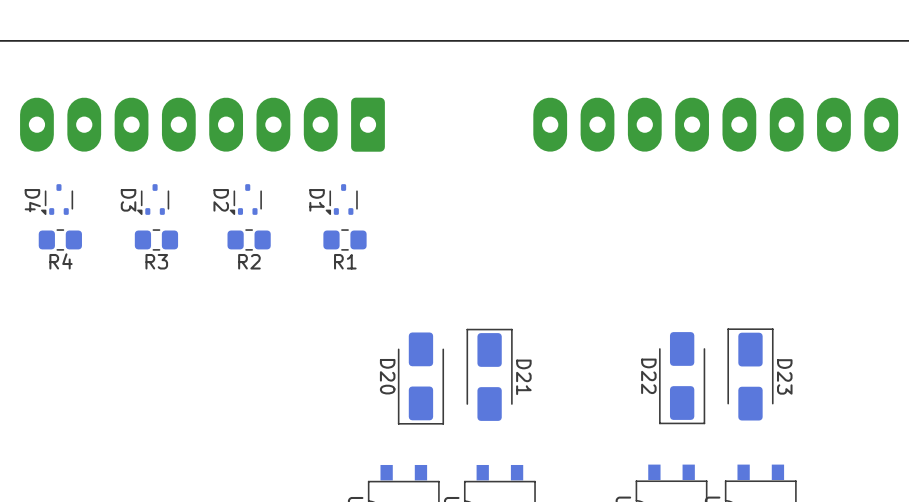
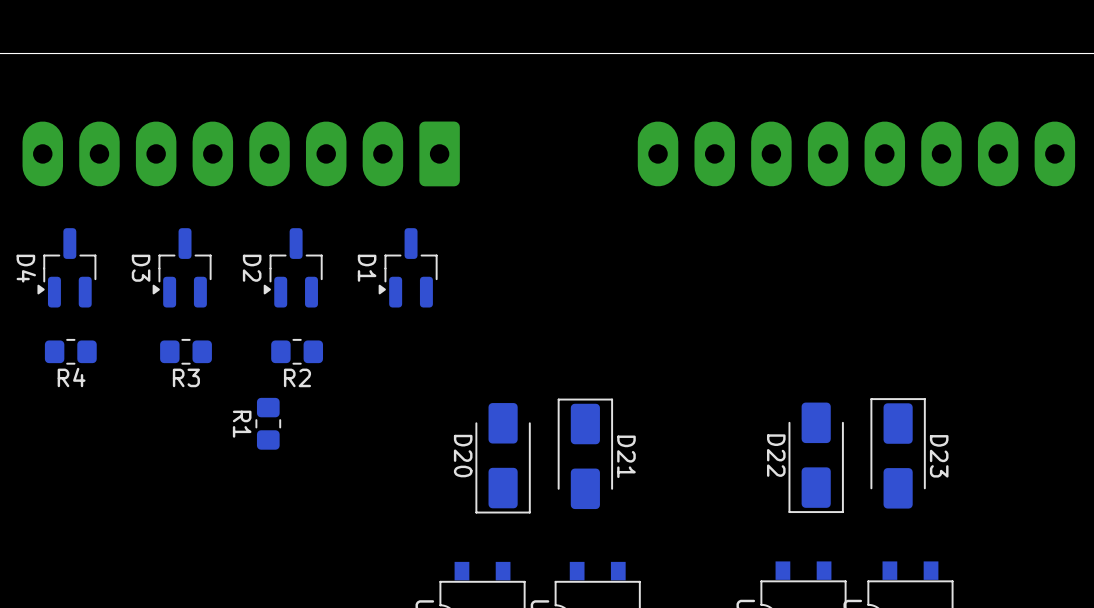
D4 footprint: [41, 184, 74, 216] -> [37, 228, 97, 308]
D3 footprint: [137, 184, 170, 216] -> [152, 228, 212, 308]
D2 footprint: [229, 184, 262, 216] -> [263, 228, 323, 308]
D1 footprint: [325, 184, 358, 216] -> [378, 228, 438, 308]
R4 position: (60, 239) -> (70, 351)
R3 position: (156, 239) -> (186, 351)
R2 position: (249, 239) -> (297, 351)
R1 rotation: 0° (344, 239) -> 90° clockwise (268, 423)
R1 position: (344, 239) -> (268, 423)

